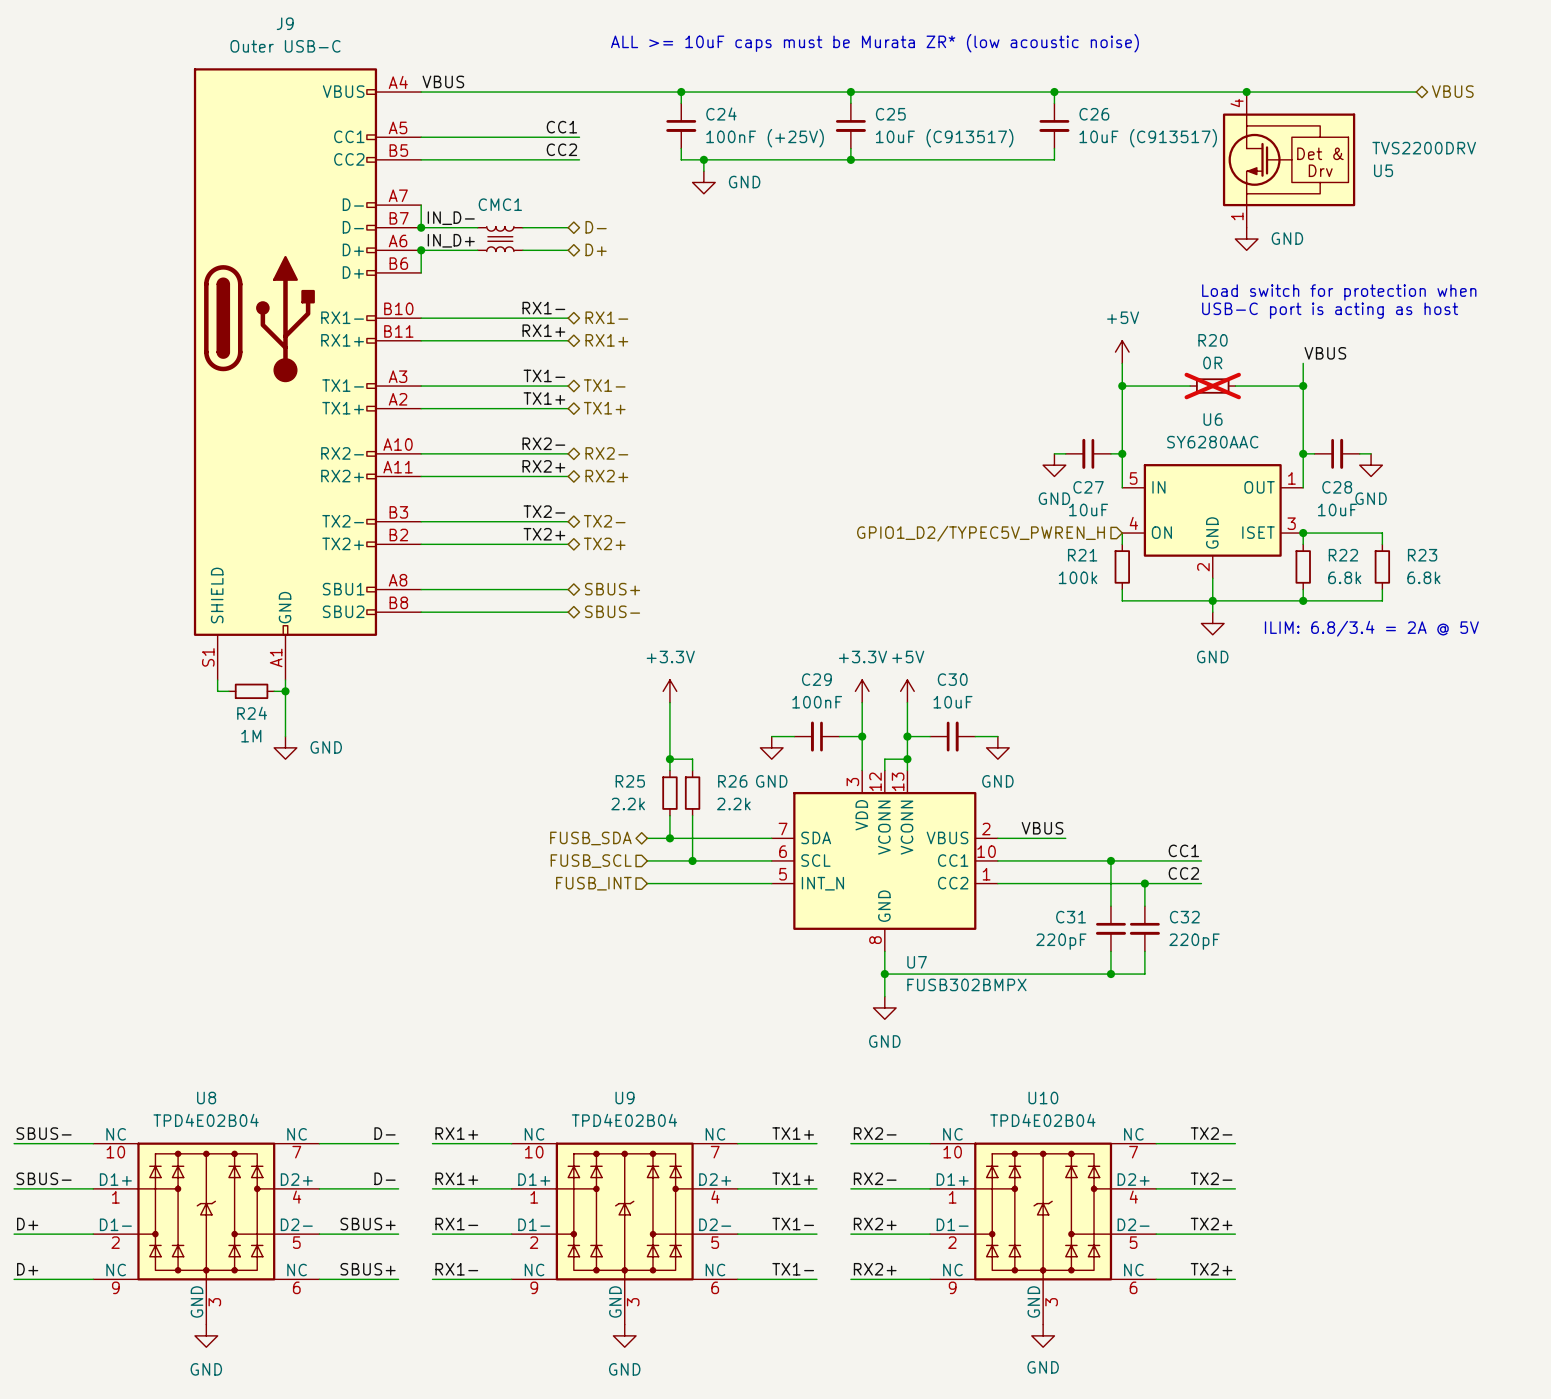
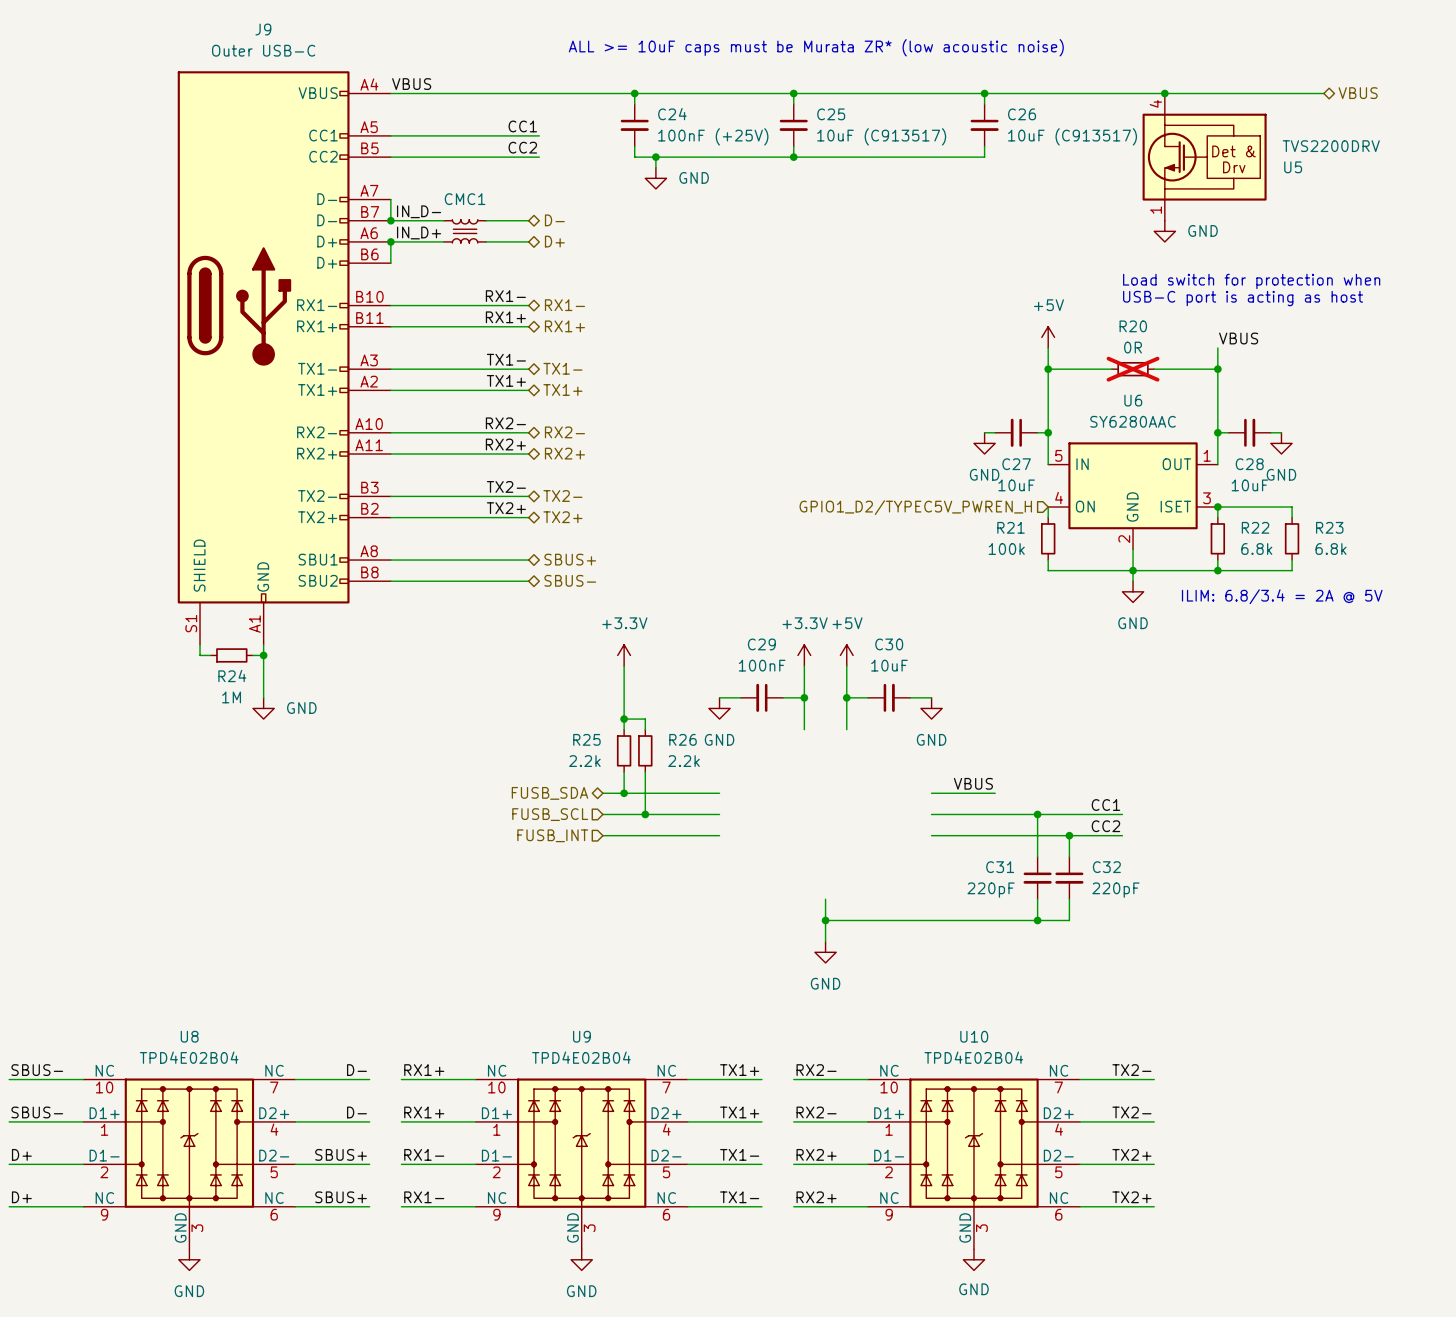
wire: (907, 759) (884, 759) (884, 770) -> none
junction: (907, 759) -> none
U7: FUSB302BMPX (884, 860) -> none

